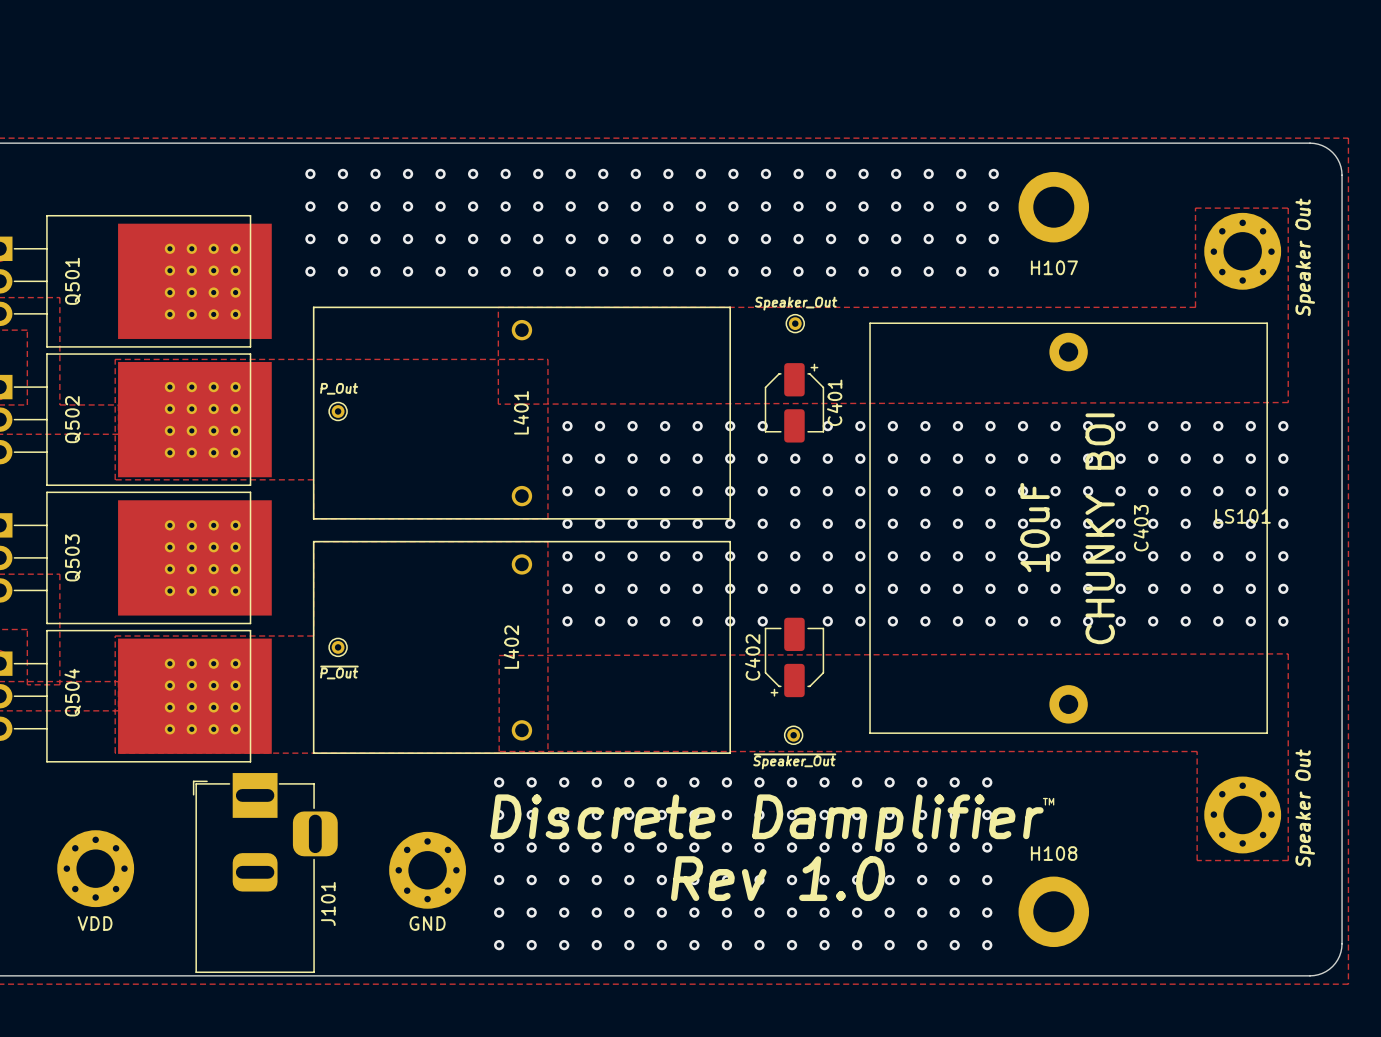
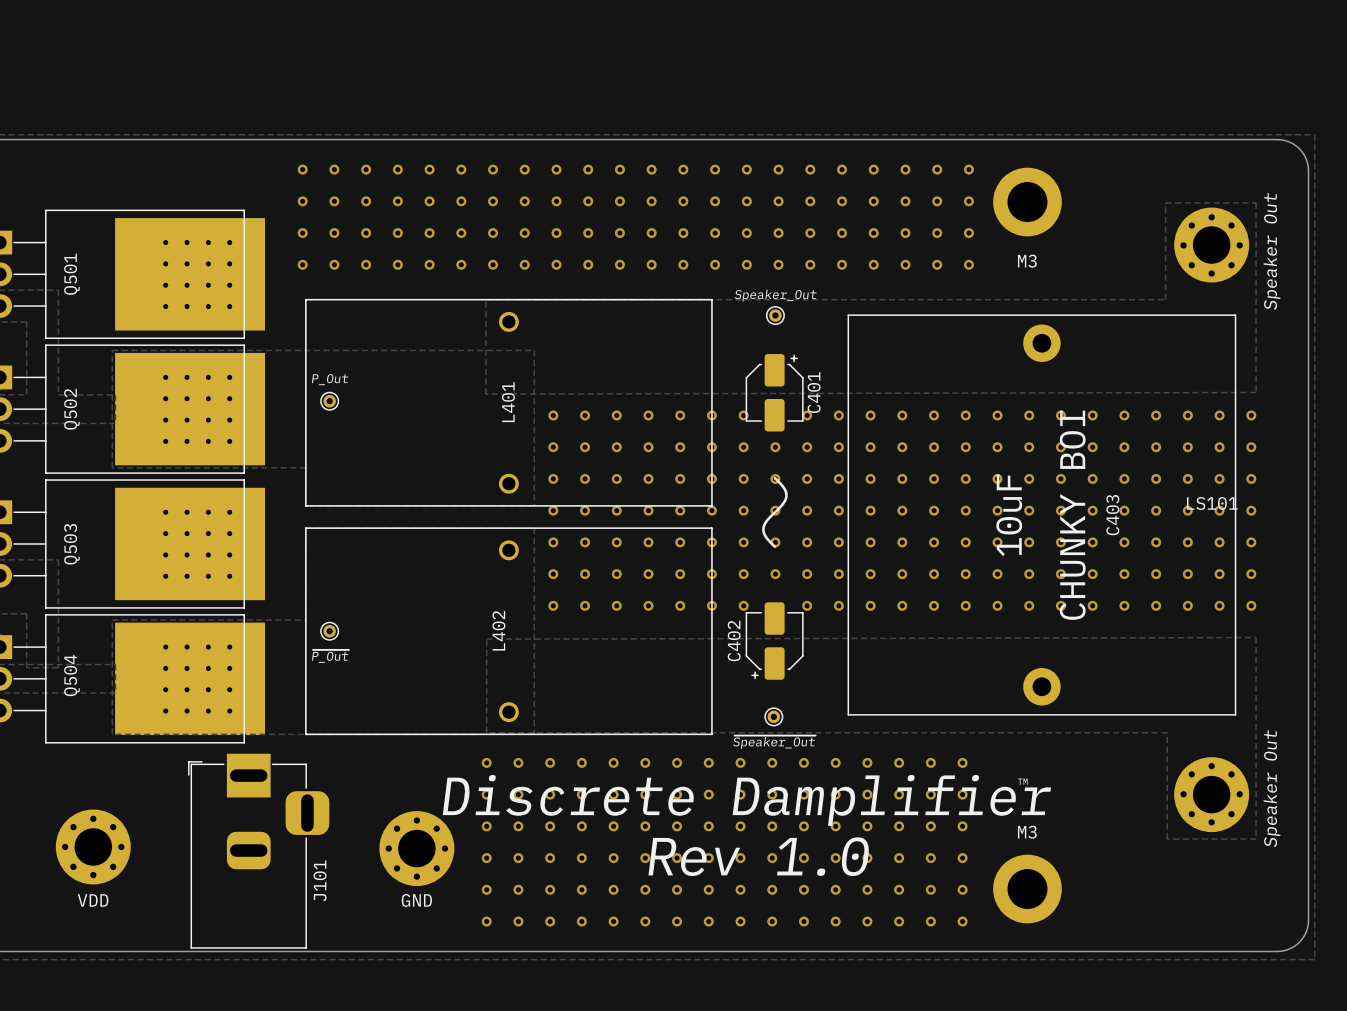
H107 name: H107 (1054, 267) -> M3 (1027, 261)
drawing: none -> [762, 476, 788, 548]
H108 name: H108 (1054, 853) -> M3 (1027, 832)

